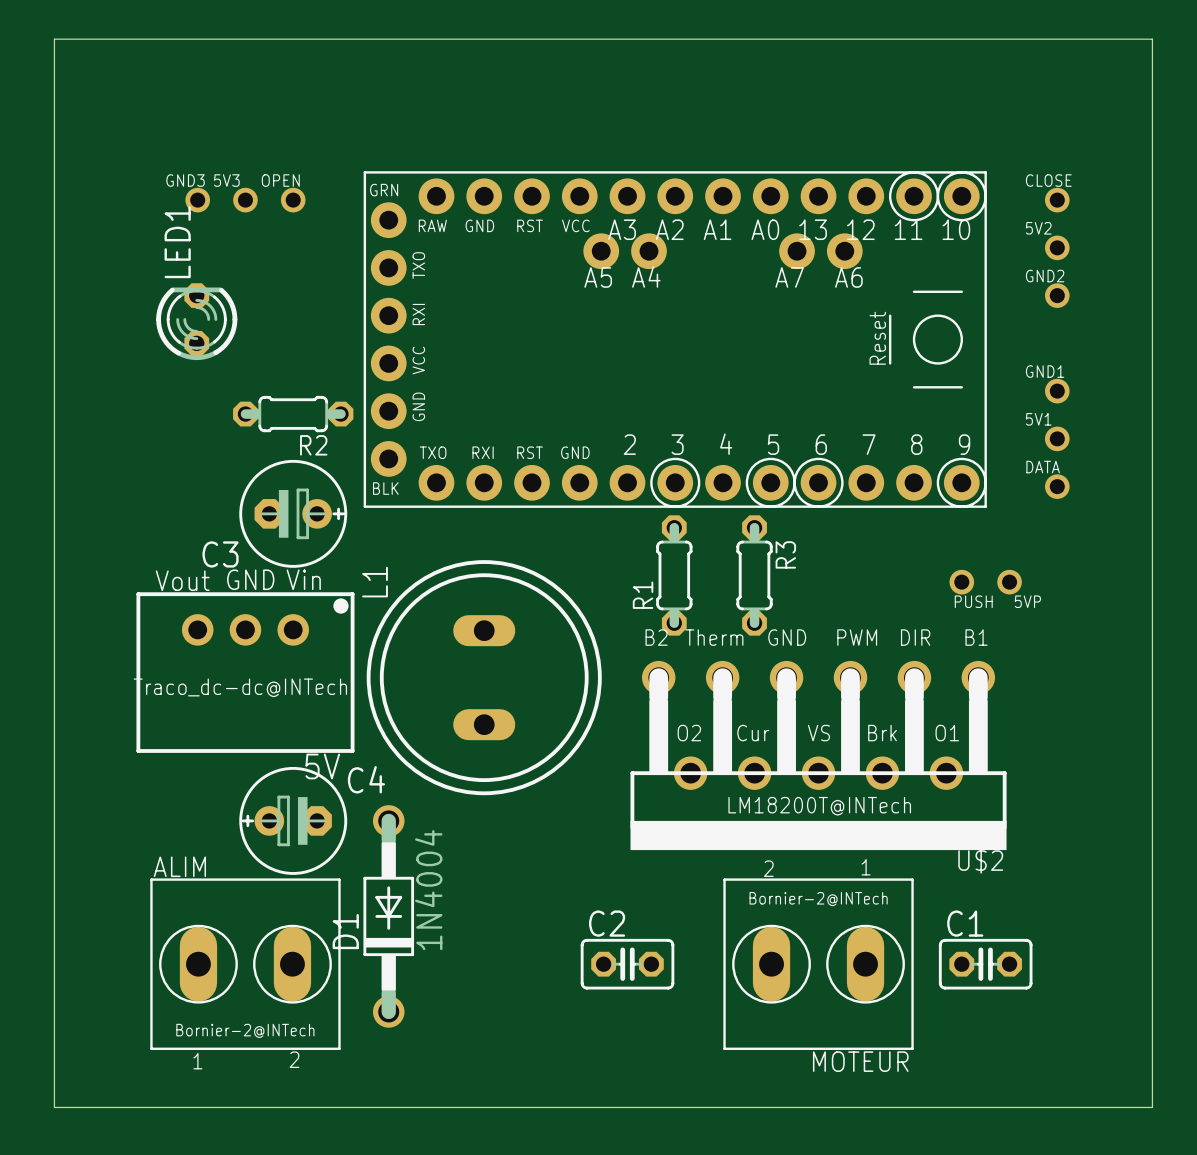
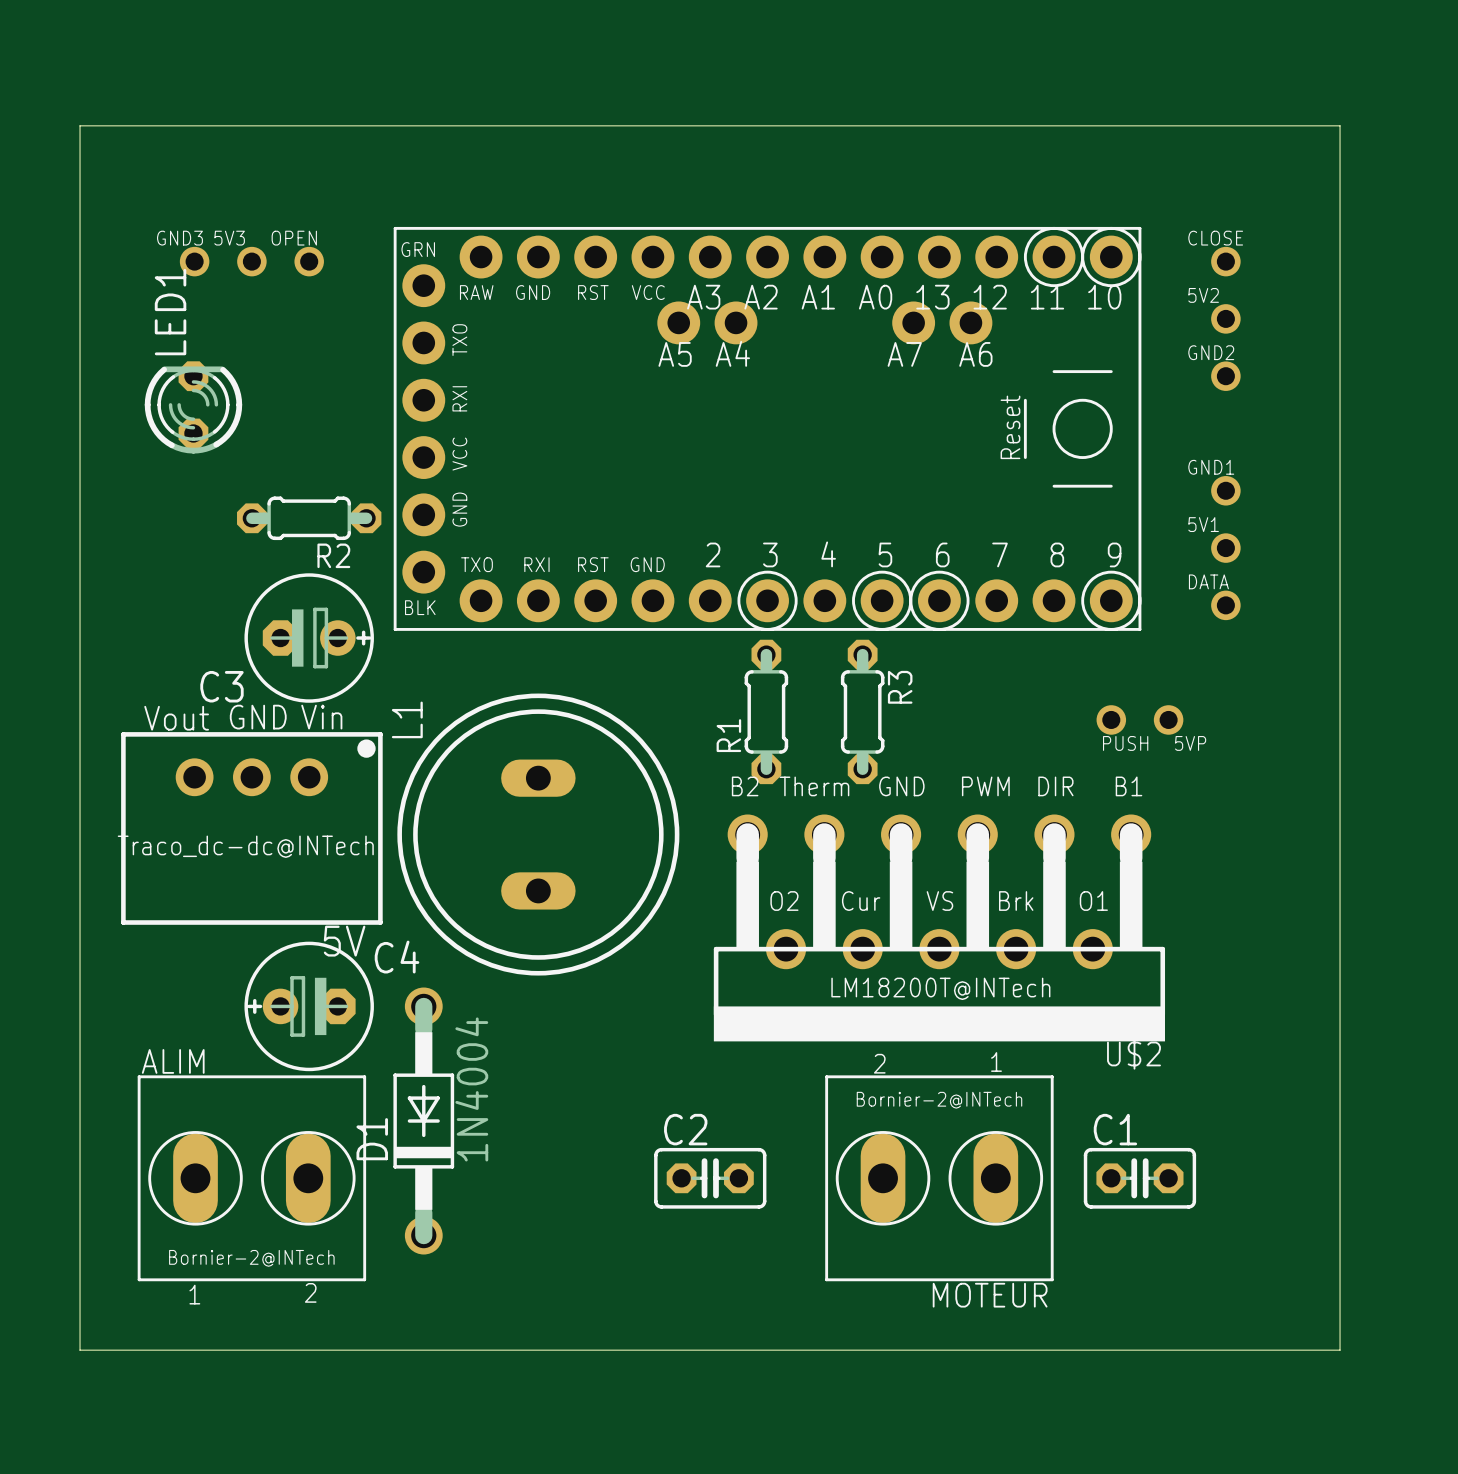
board edge: (1152, 86) (1152, 39) (54, 39) (54, 1107) (102, 1107) -> (1340, 125) (80, 125) (80, 1350)

